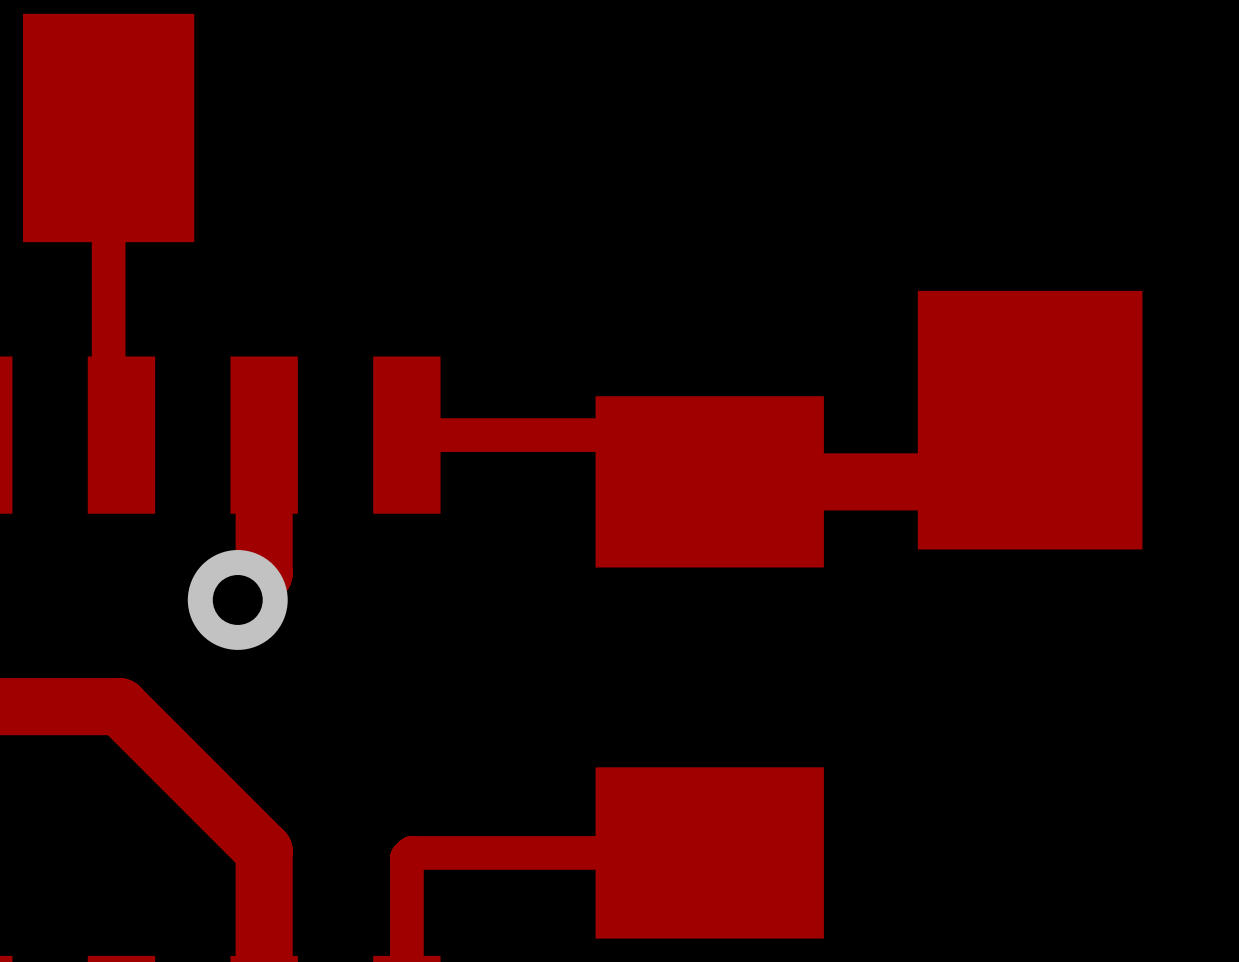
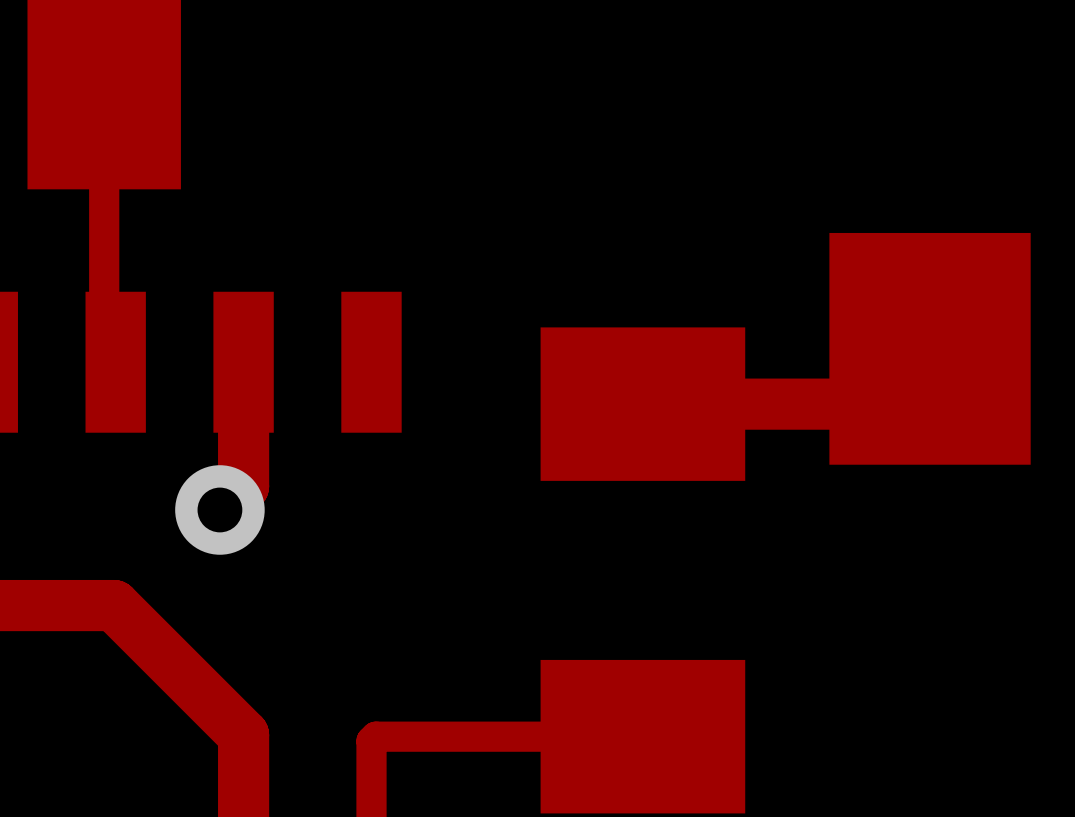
track: (406, 435) (662, 435) (709, 481) -> none

